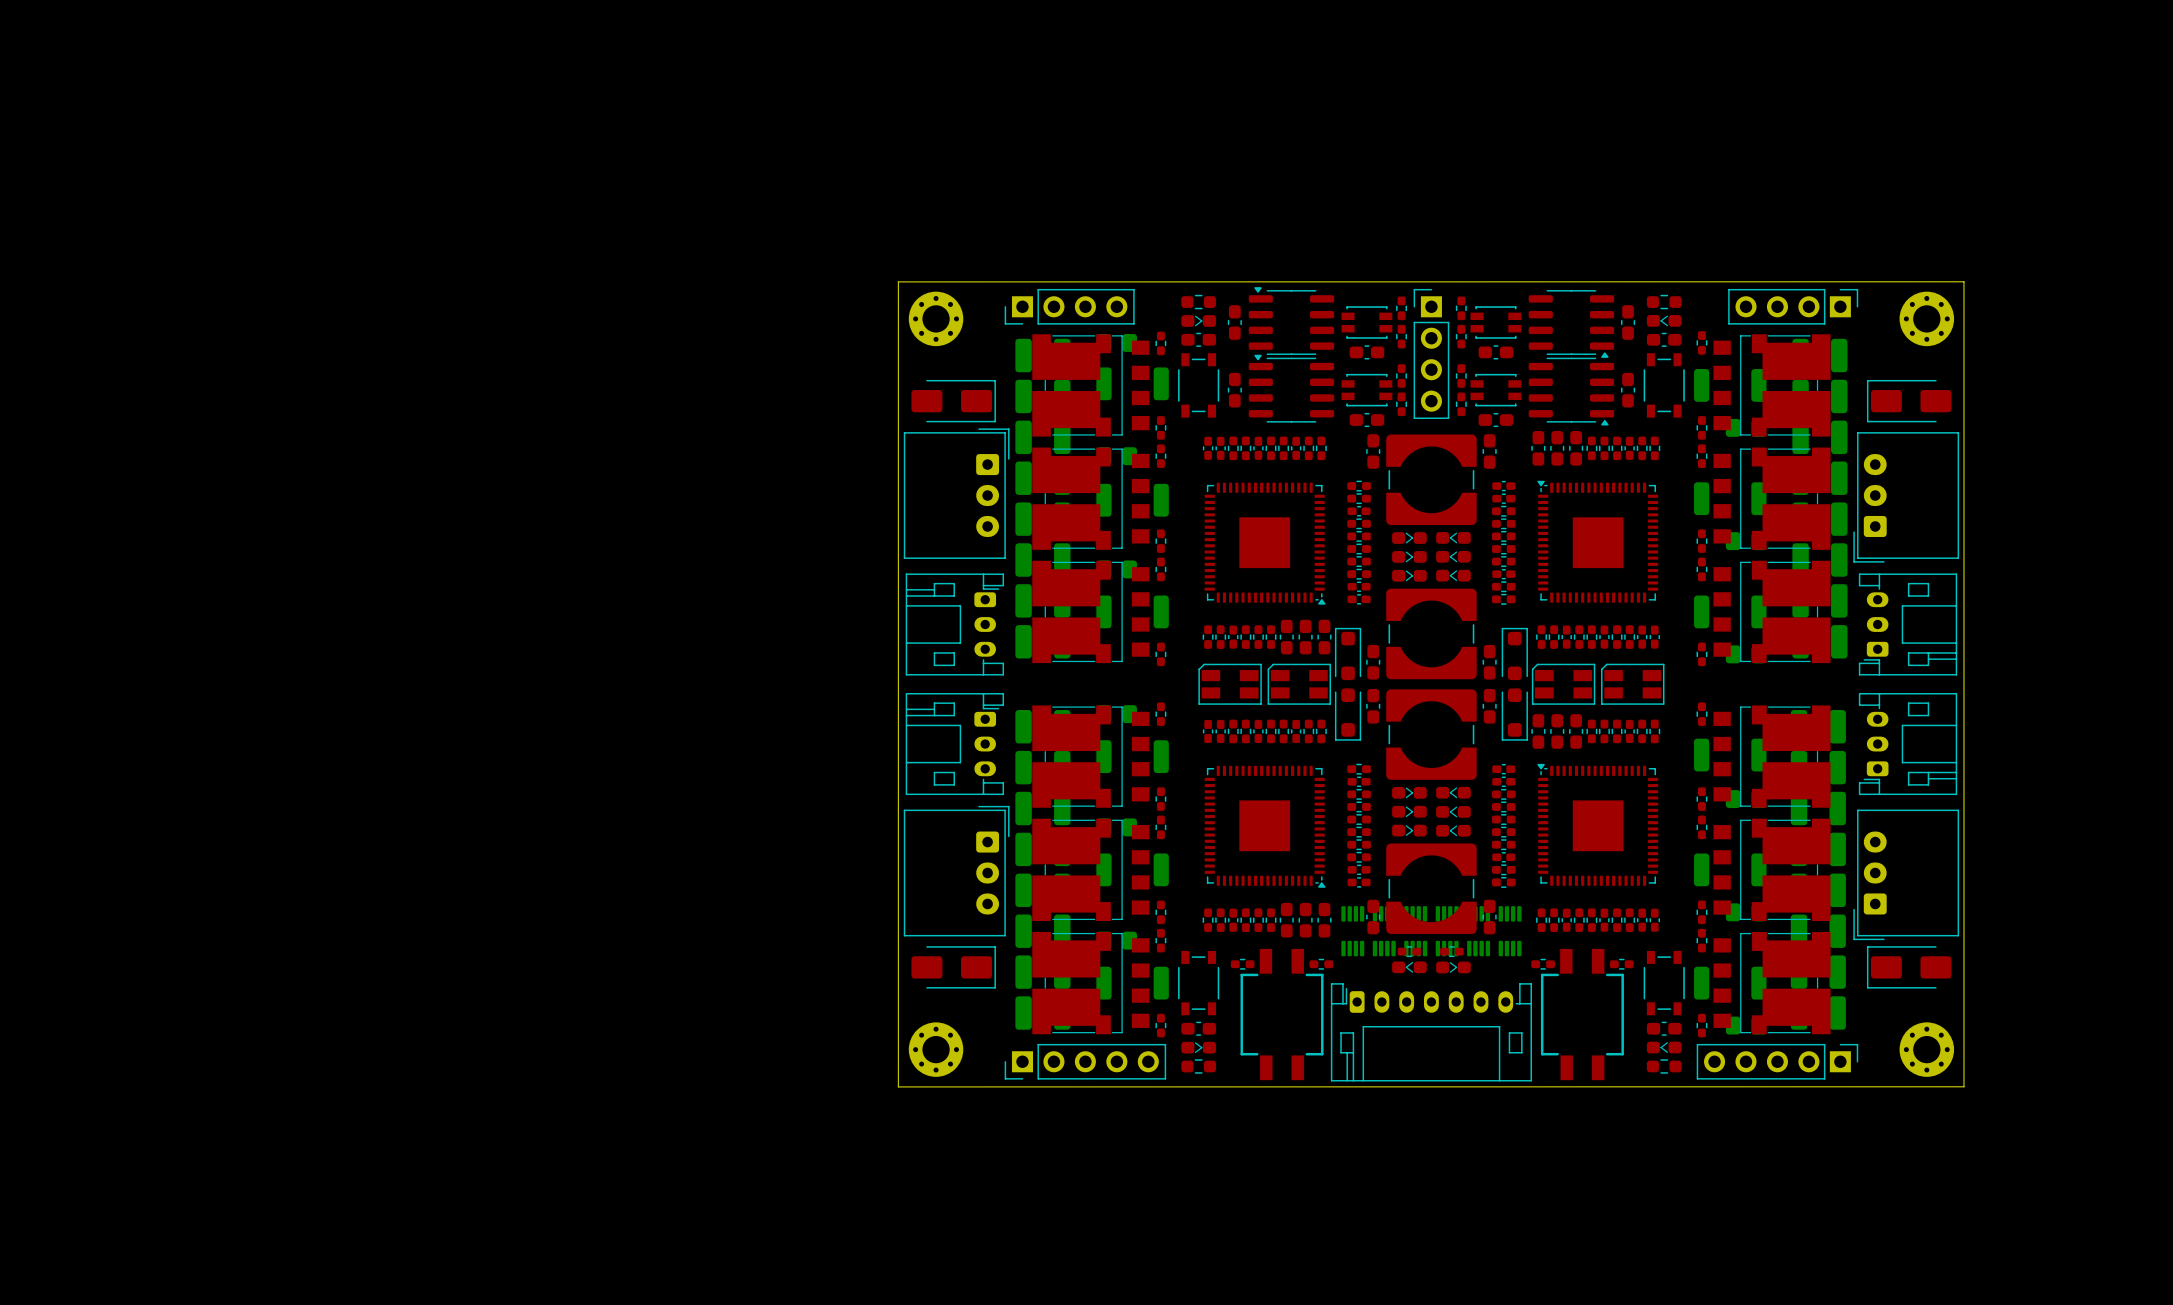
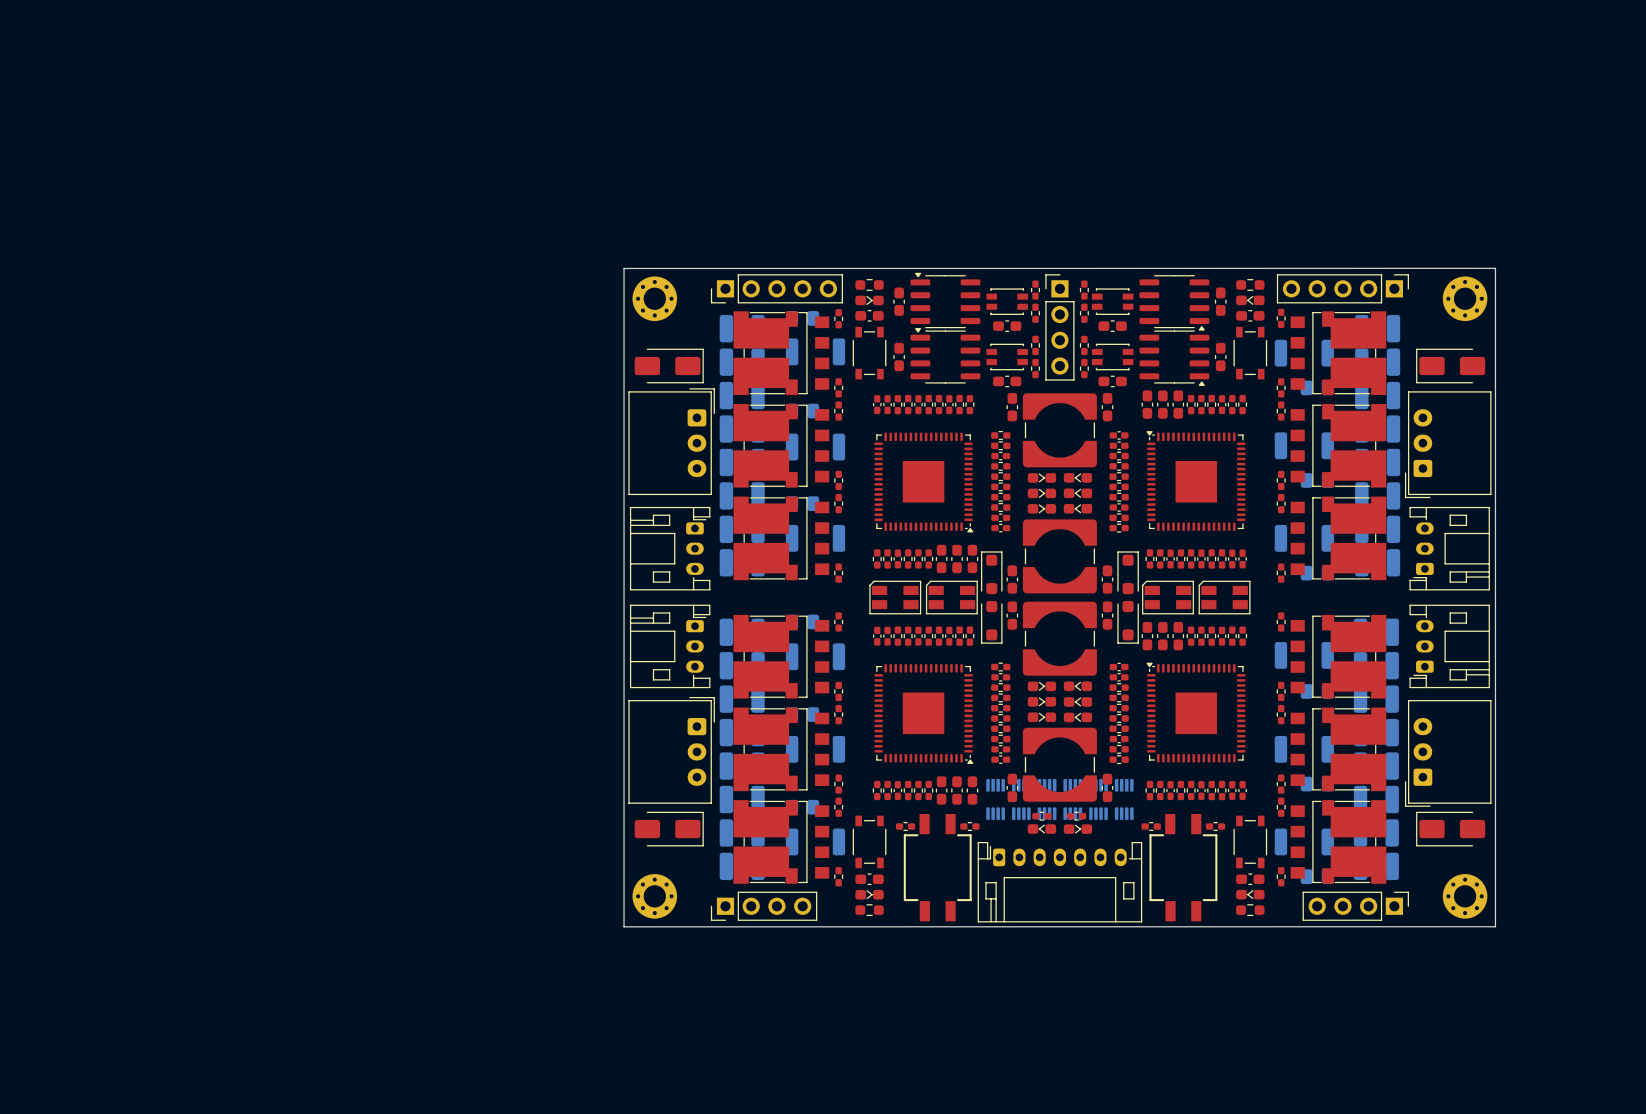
part: (1069, 306) -> none
part: none -> (776, 288)
part: none -> (1342, 288)
part: (1793, 306) -> none
part: none -> (764, 906)
part: (1085, 1061) -> none
part: (1777, 1061) -> none
part: none -> (1355, 906)

